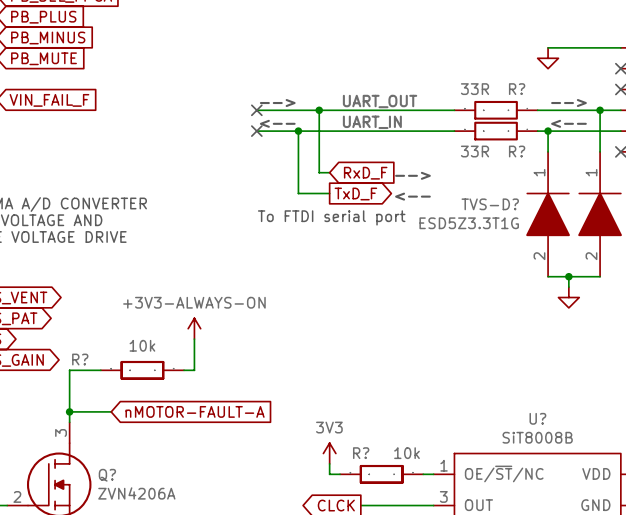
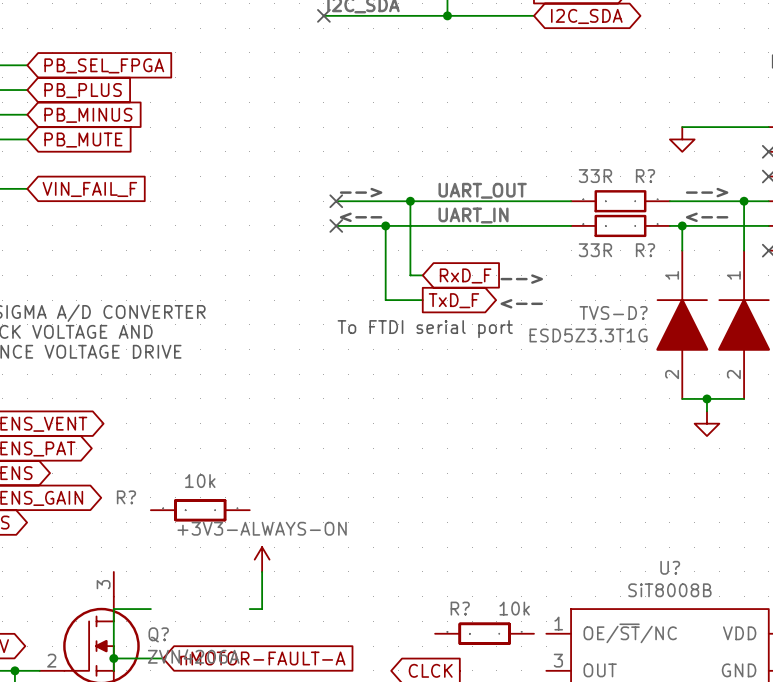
power symbol position: +3V3-ALWAYS-ON (194, 328) -> +3V3-ALWAYS-ON (262, 559)
wire: (194, 339) (194, 370) (184, 370) -> (262, 571) (262, 609) (249, 609)
wire: (100, 370) (69, 370) (69, 422) -> (150, 609) (113, 609) (113, 670)
wire: (69, 411) (111, 411) -> (113, 658) (163, 658)
junction: (69, 411) -> none
global label position: nMOTOR-FAULT-A (195, 411) -> nMOTOR-FAULT-A (262, 658)
power symbol: 3V3 (329, 453) -> none
wire: (329, 463) (329, 474) (340, 474) -> none
wire: (423, 474) (433, 474) -> none
junction: none -> (113, 658)
wire: (360, 505) (433, 505) -> none

